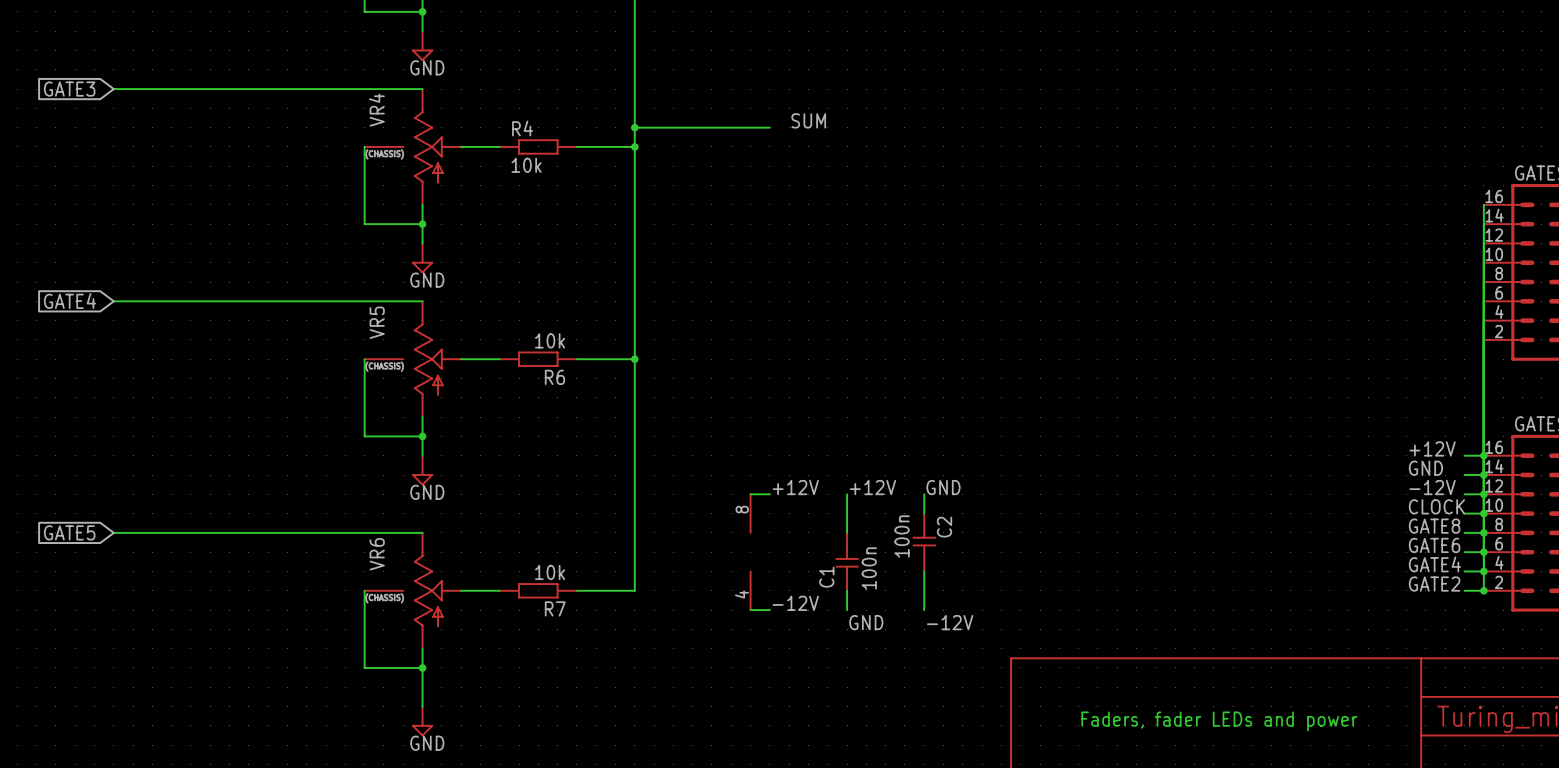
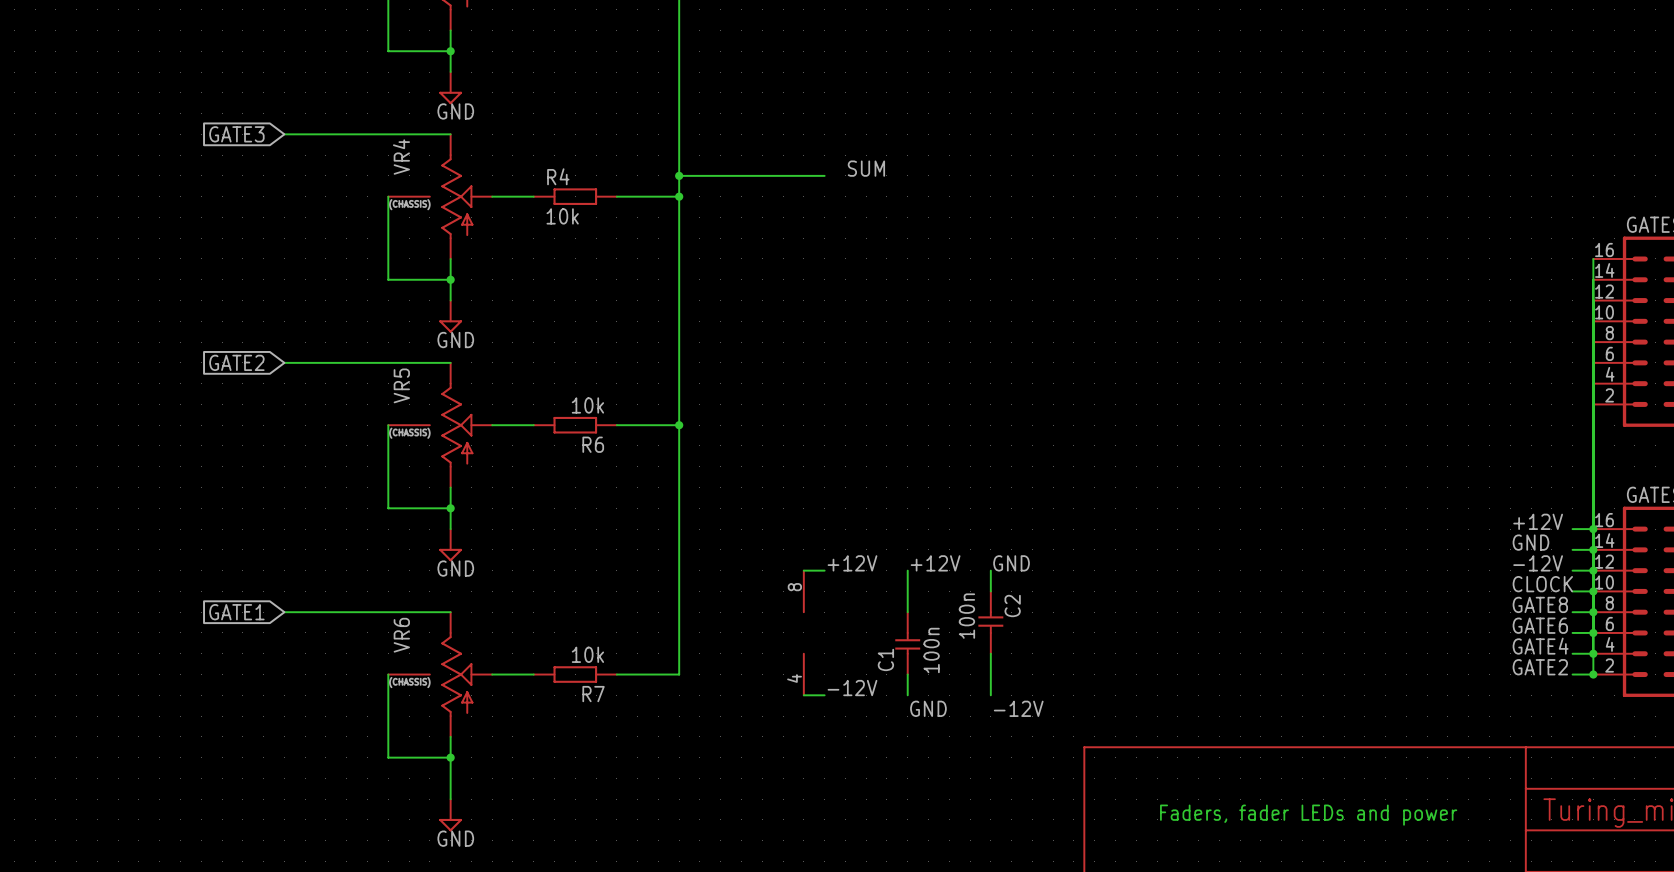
global label position: GATE3 (69, 89) -> GATE3 (236, 134)
wire: (113, 89) (268, 89) -> none
global label: GATE4 (69, 301) -> none
wire: (113, 301) (268, 301) -> none
global label: none -> GATE2 (236, 362)
global label: GATE5 (69, 532) -> none
wire: (113, 532) (268, 532) -> none
global label: none -> GATE1 (236, 612)

